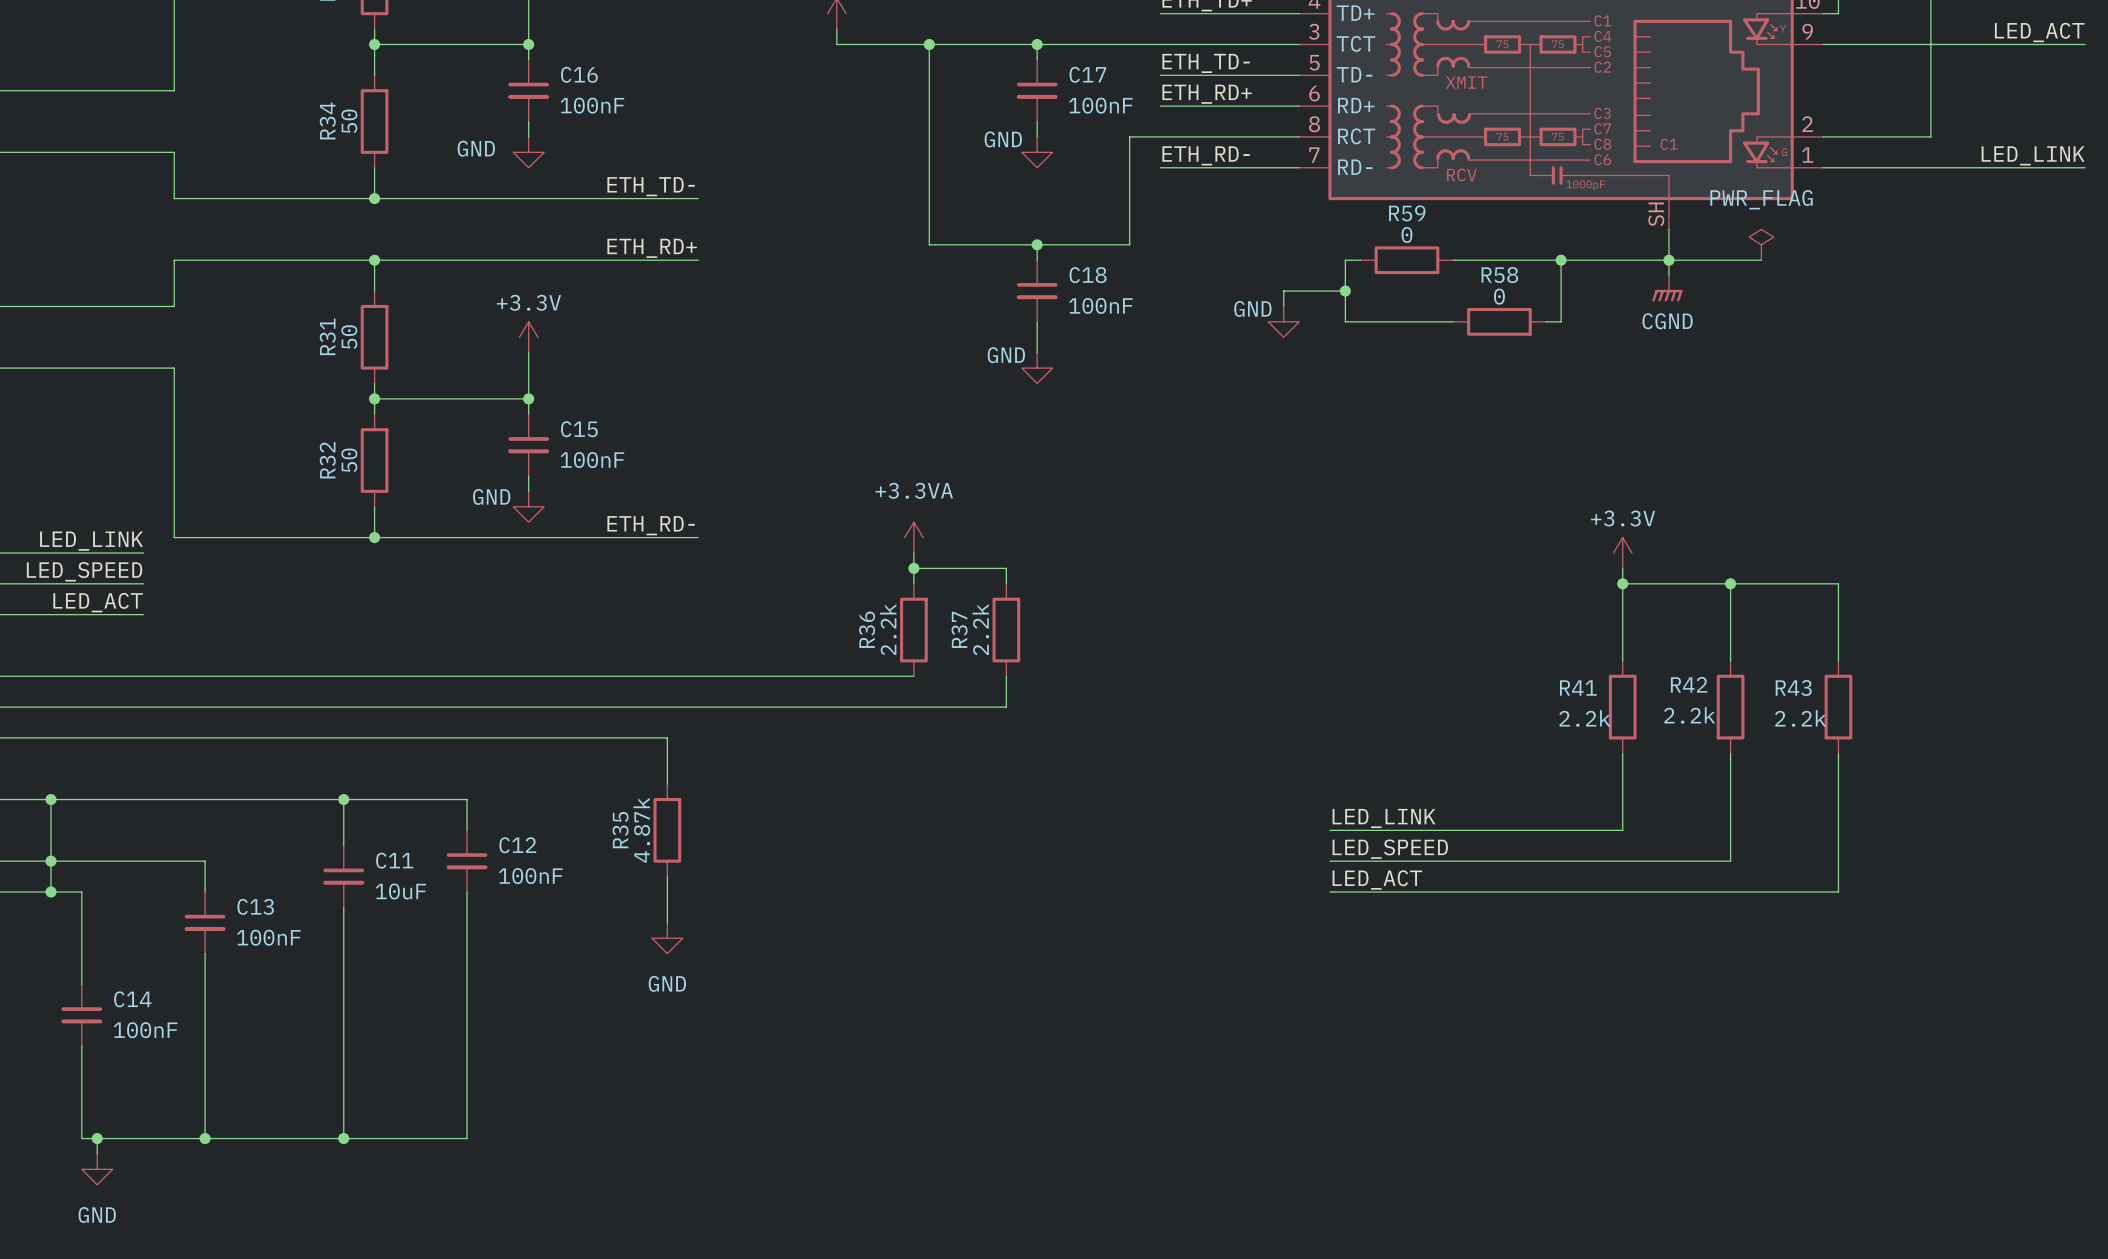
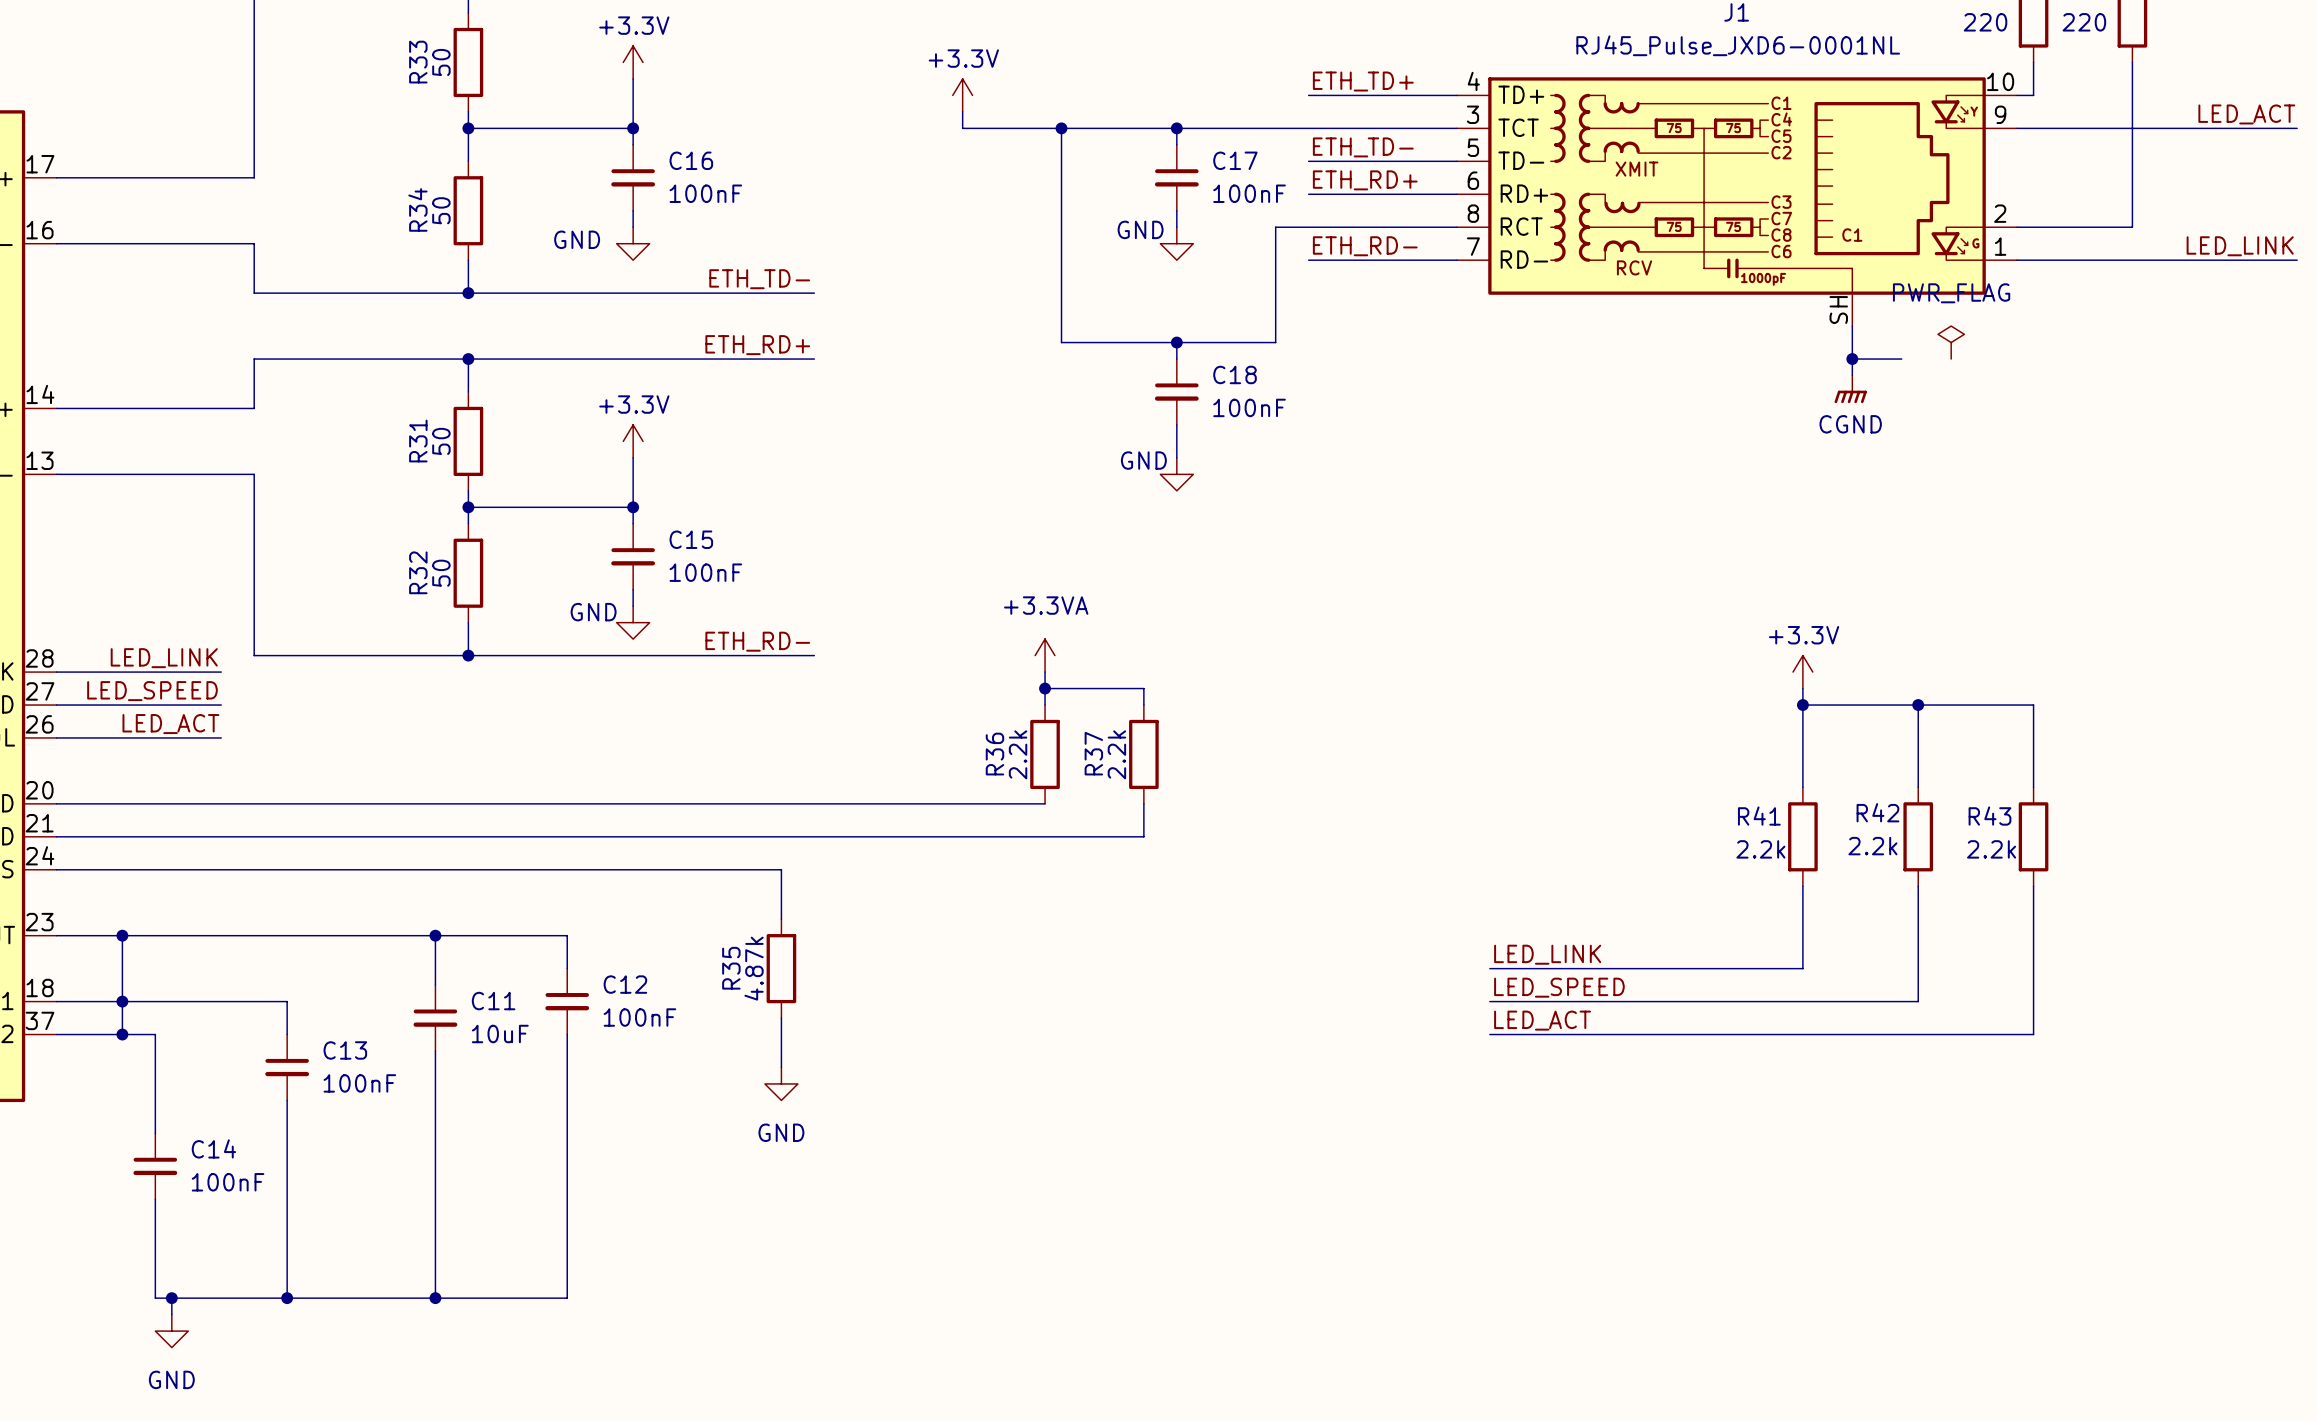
wire: (1360, 260) (1345, 260) (1345, 321) (1453, 321) -> none
R59: 0 (1406, 260) -> none
wire: (1453, 260) (1668, 260) -> none
wire: (1561, 260) (1561, 321) (1545, 321) -> none
junction: (1561, 260) -> none
wire: (1715, 260) (1761, 260) -> none
wire: (1345, 291) (1283, 291) (1283, 306) -> none
junction: (1345, 291) -> none
power symbol: GND (1283, 321) -> none
R58: 0 (1499, 321) -> none

